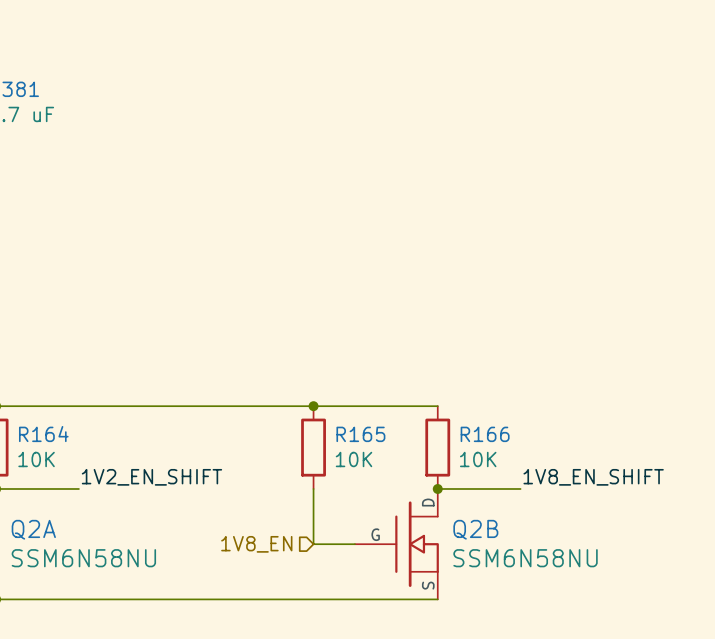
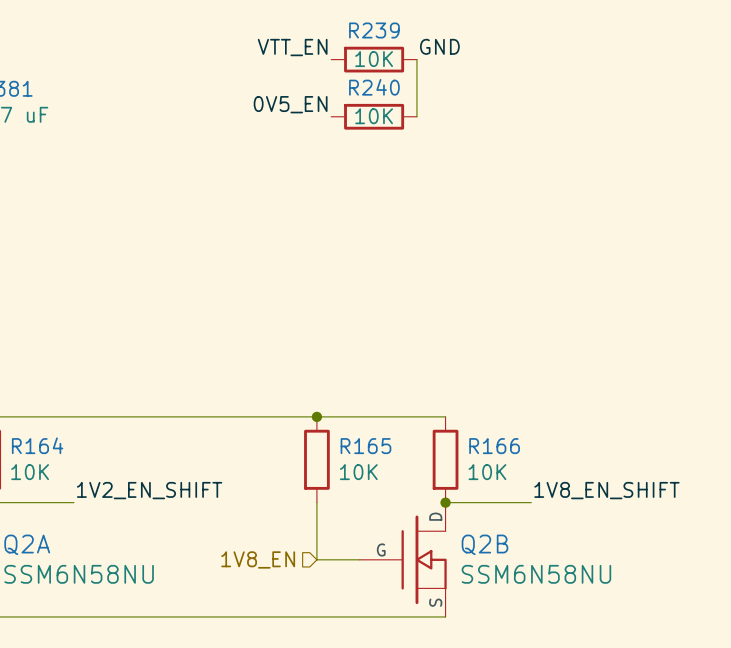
label: none -> GND (439, 46)
label: none -> VTT_EN (292, 47)
R239: none -> 10K (374, 59)
wire: none -> (416, 59) (416, 116)
label: none -> 0V5_EN (290, 104)
R240: none -> 10K (374, 116)

